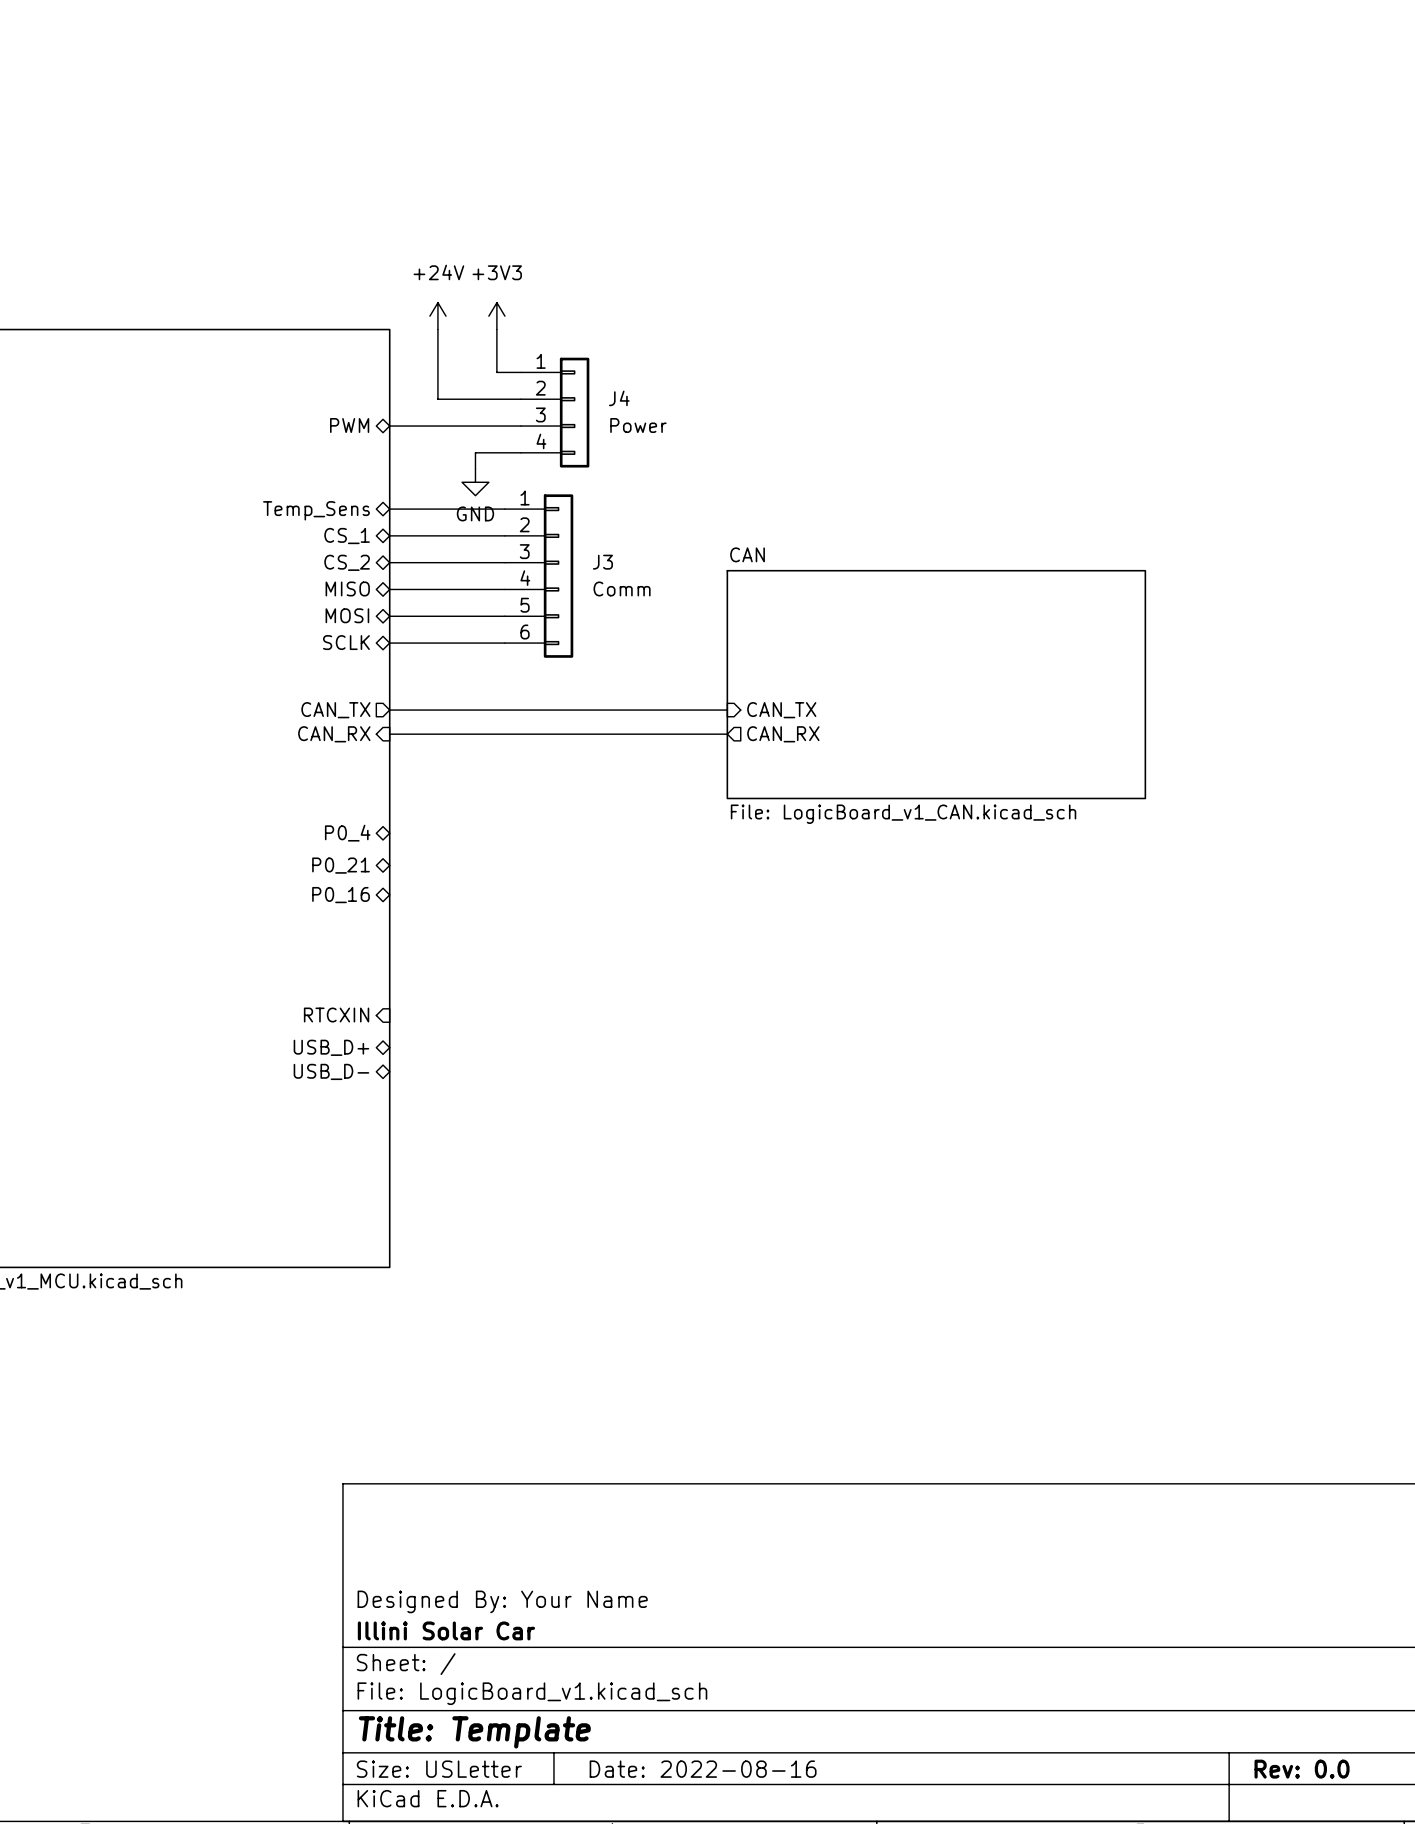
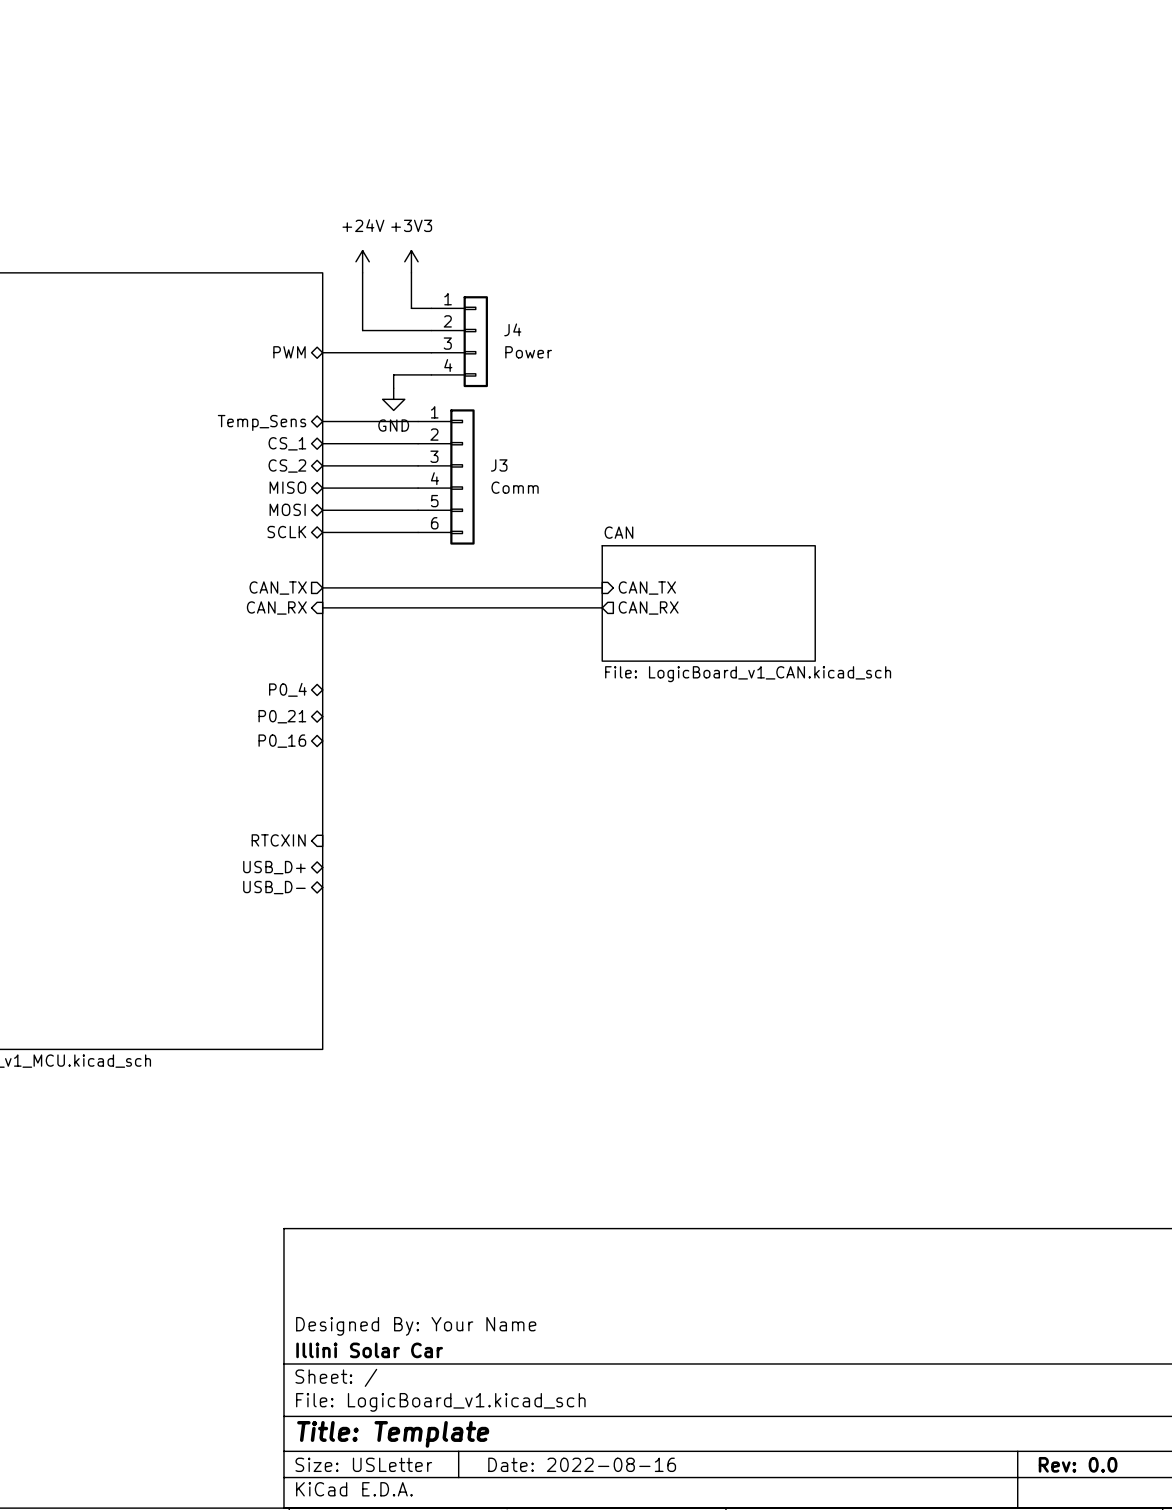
sheet CAN: File: LogicBoard_v1_CAN.kicad_sch (936, 684) -> none
sheet CAN: none -> File: LogicBoard_v1_CAN.kicad_sch (708, 603)

